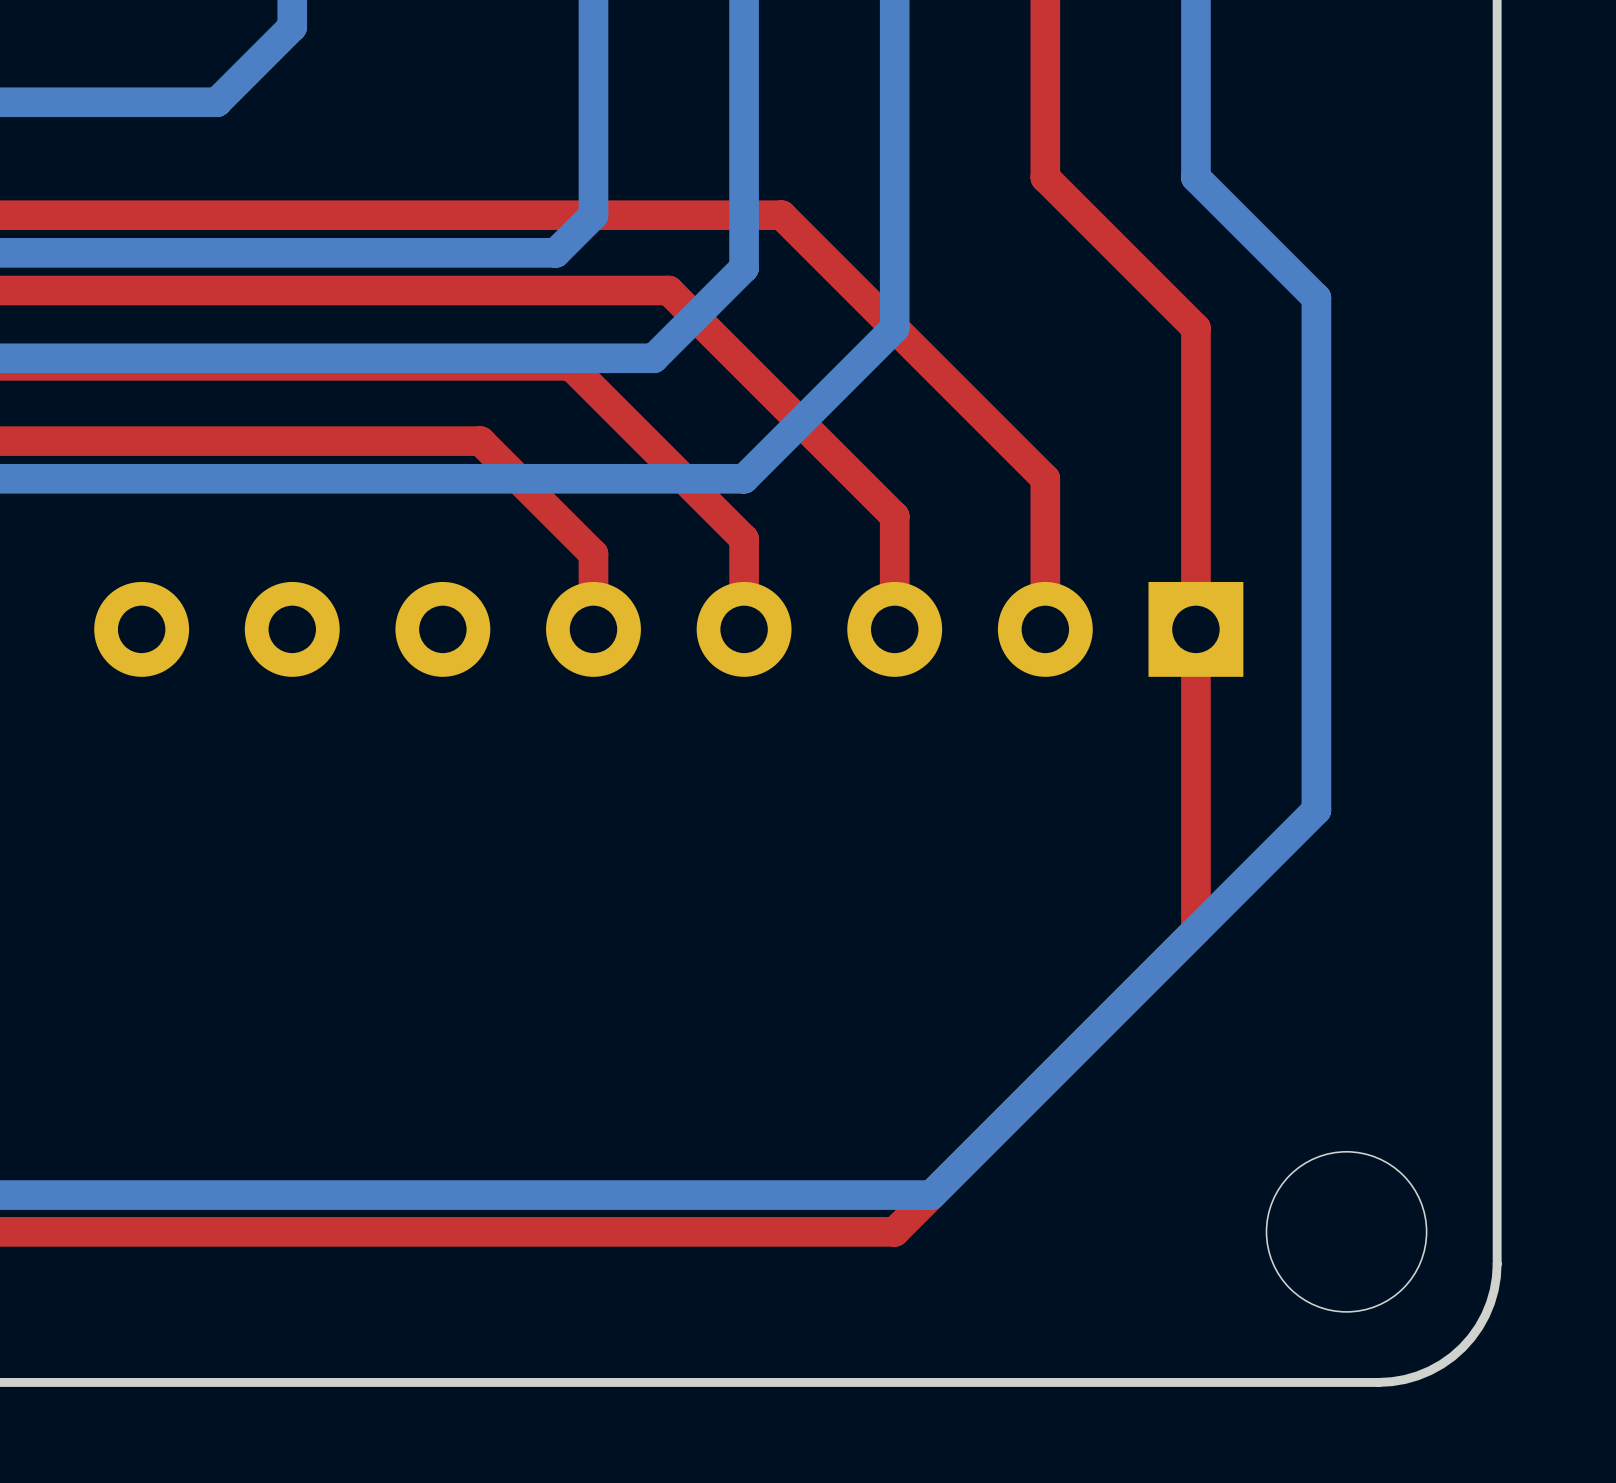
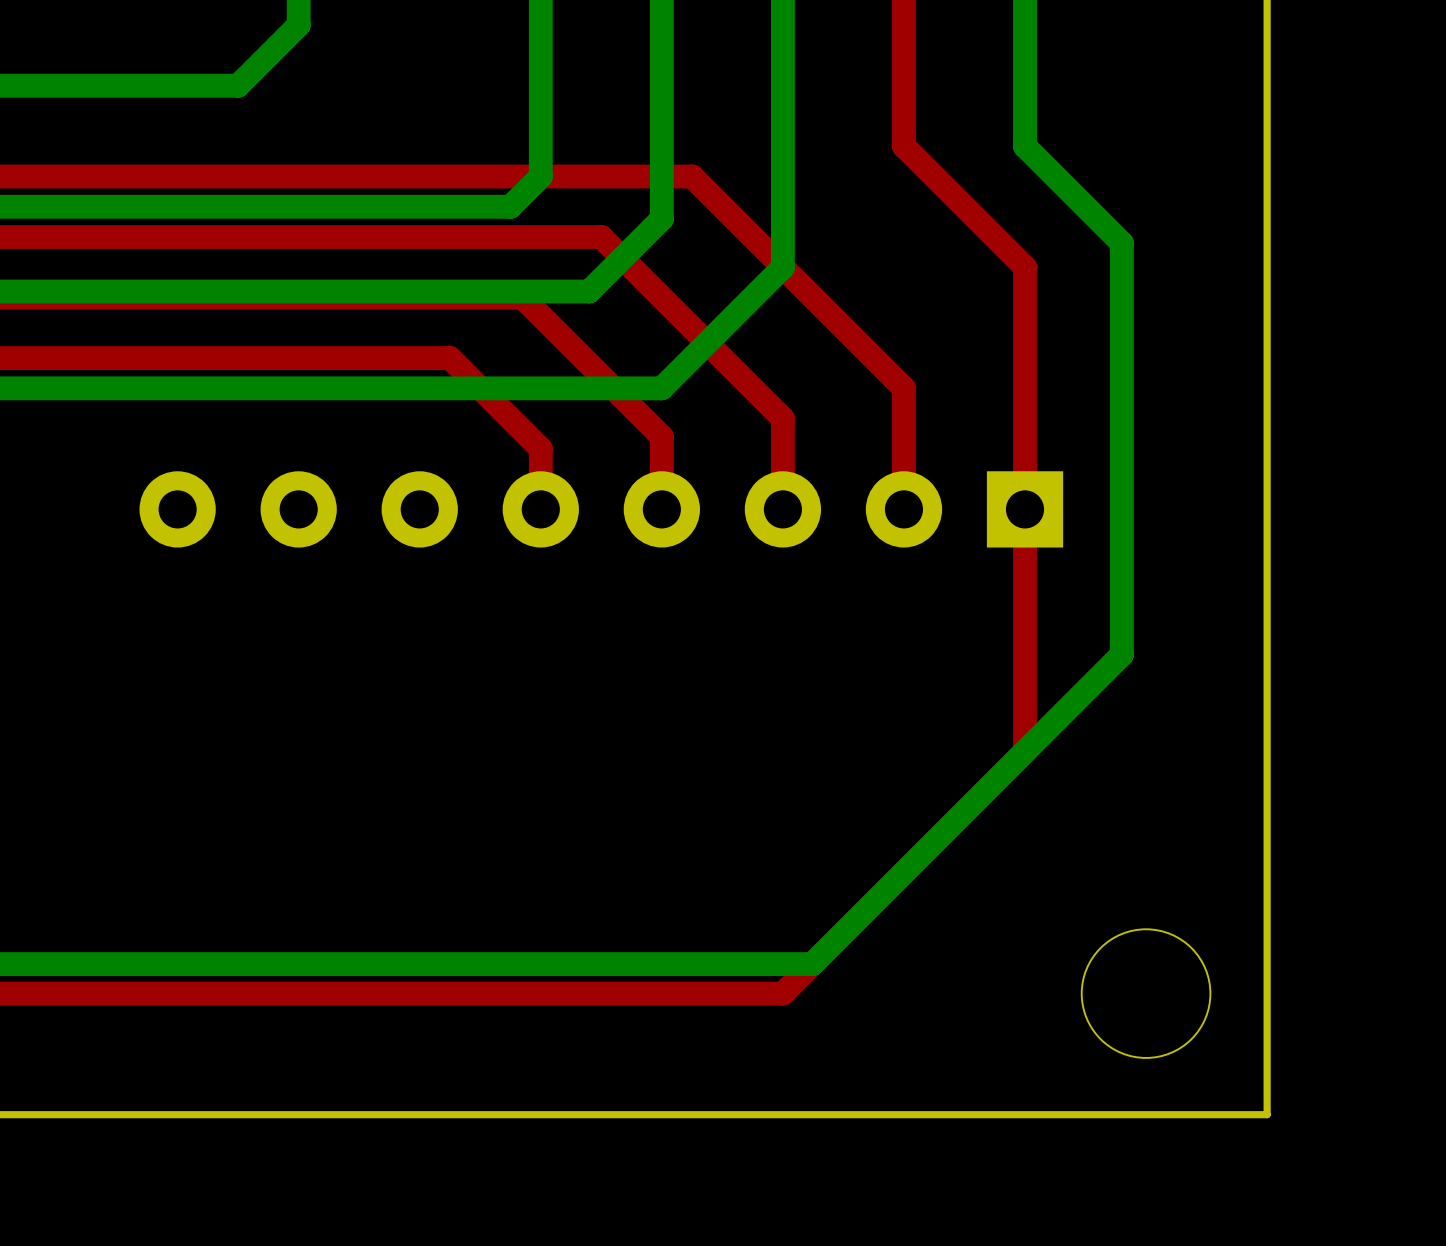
board edge: (1497, 1263) (1490, 1303) (1478, 1326) (1462, 1347) (1441, 1364) (1417, 1375) (1378, 1382) -> (1267, 1019) (1267, 1114) (1171, 1114)

